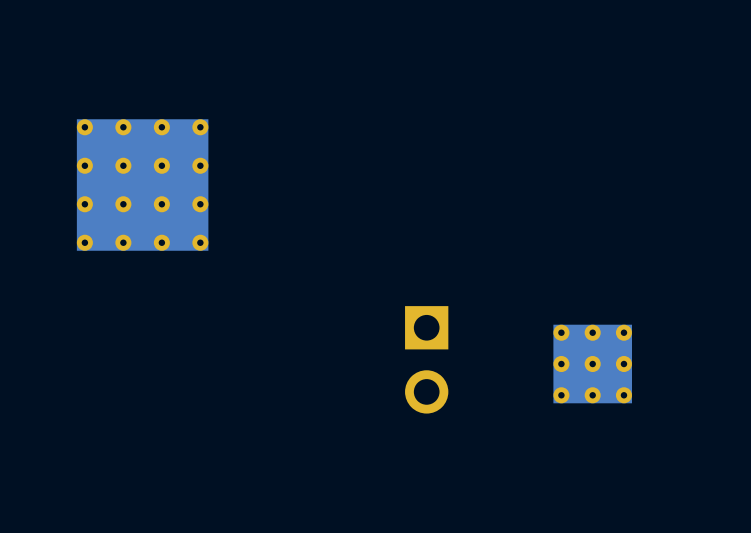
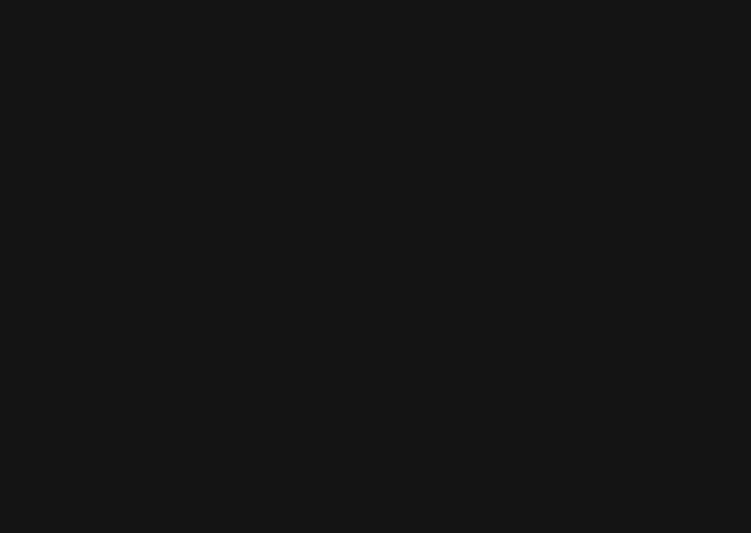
part: (142, 185) -> none
part: (426, 359) -> none
part: (592, 364) -> none

